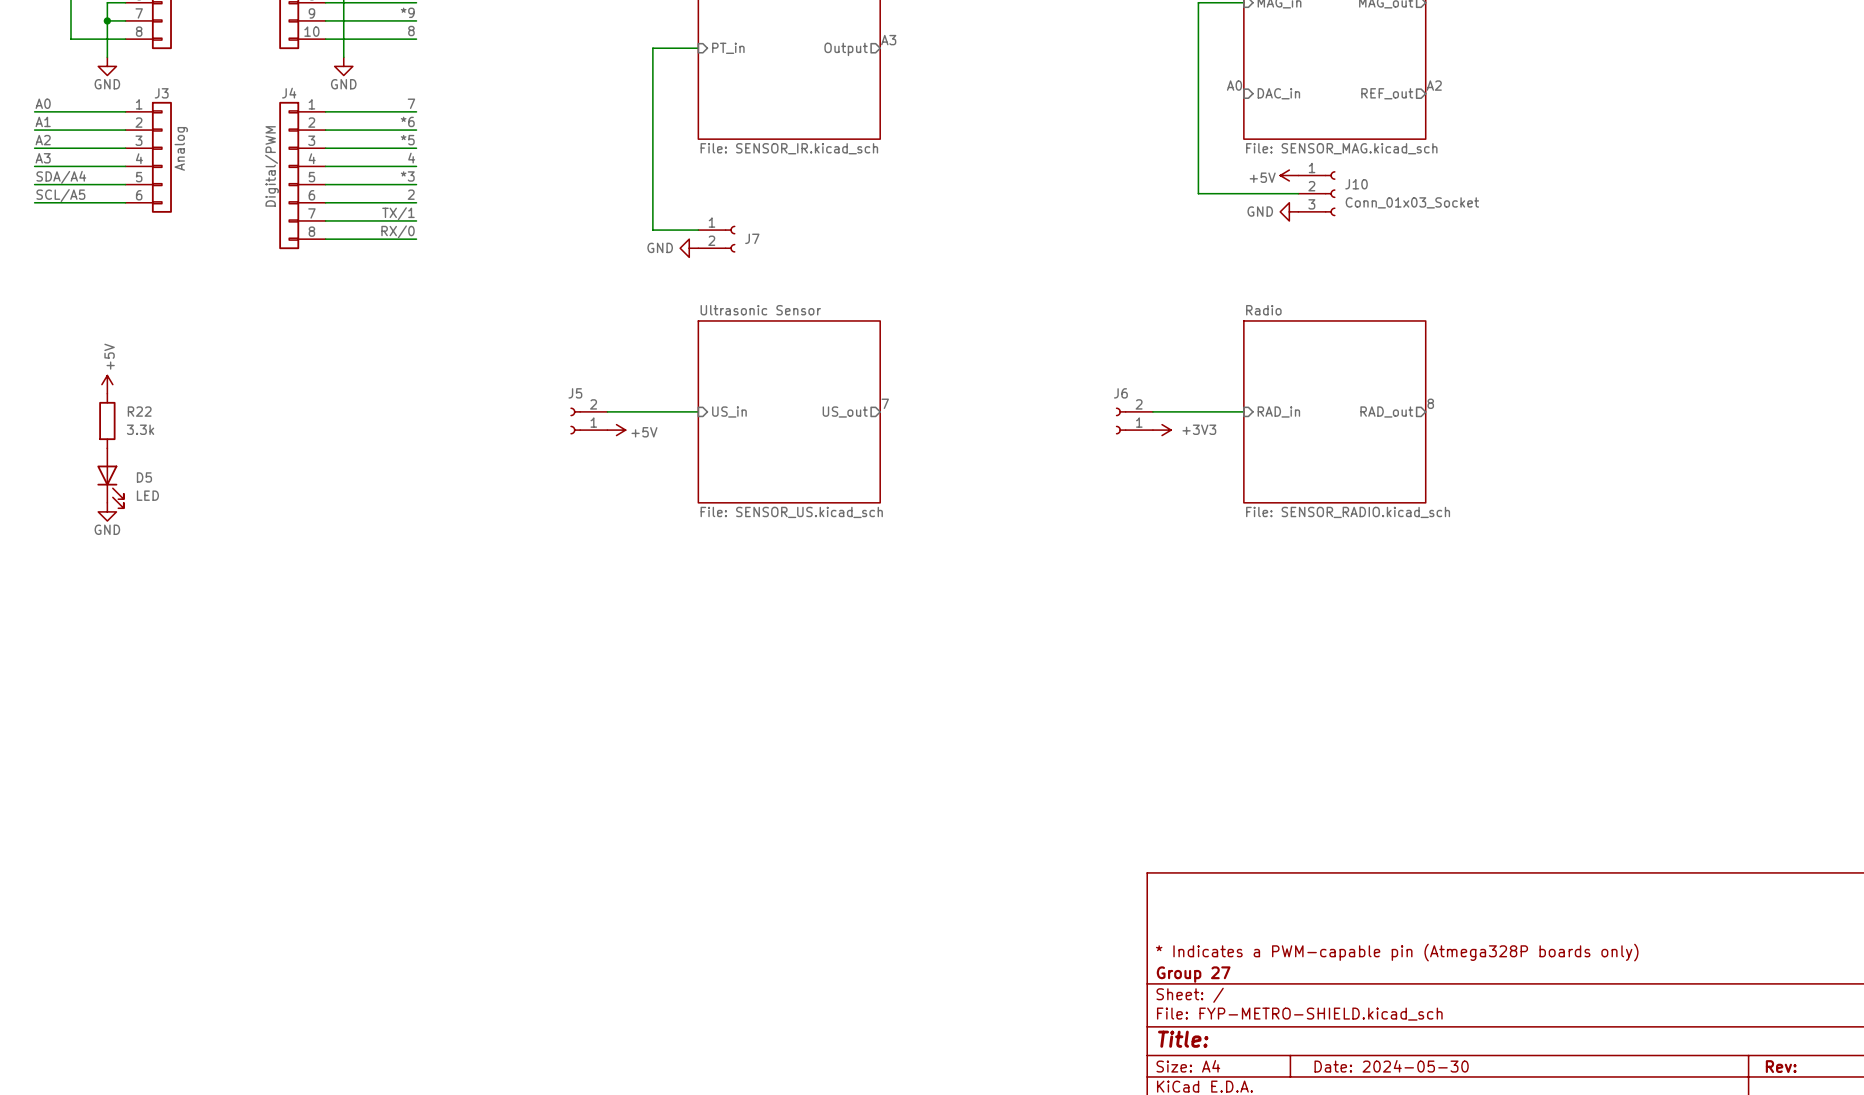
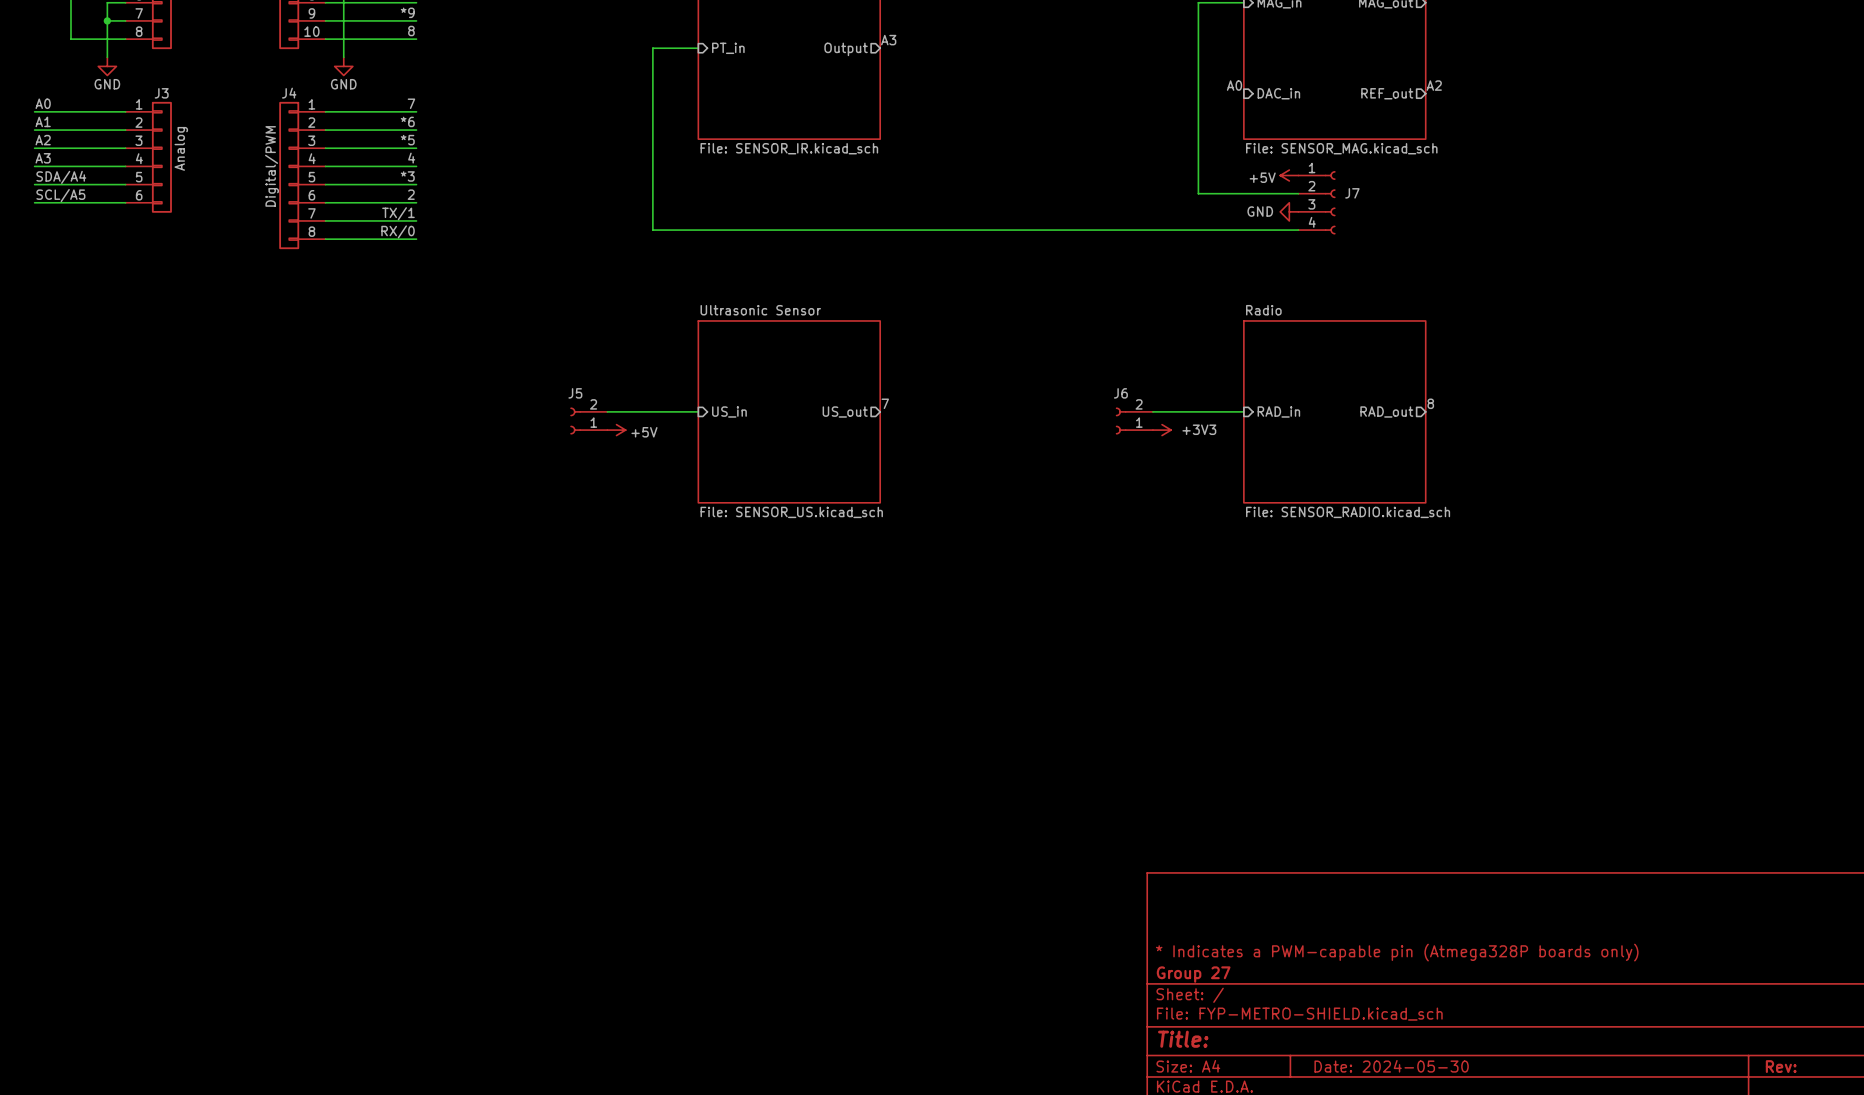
J10: Conn_01x03_Socket (1316, 193) -> none
J7 symbol: [698, 225, 736, 253] -> [1298, 171, 1336, 235]
wire: none -> (698, 230) (1298, 230)
power symbol: GND (689, 248) -> none
power symbol: +5V (107, 384) -> none
R22: 3.3k (107, 420) -> none
D5: LED (110, 478) -> none
power symbol: GND (107, 511) -> none

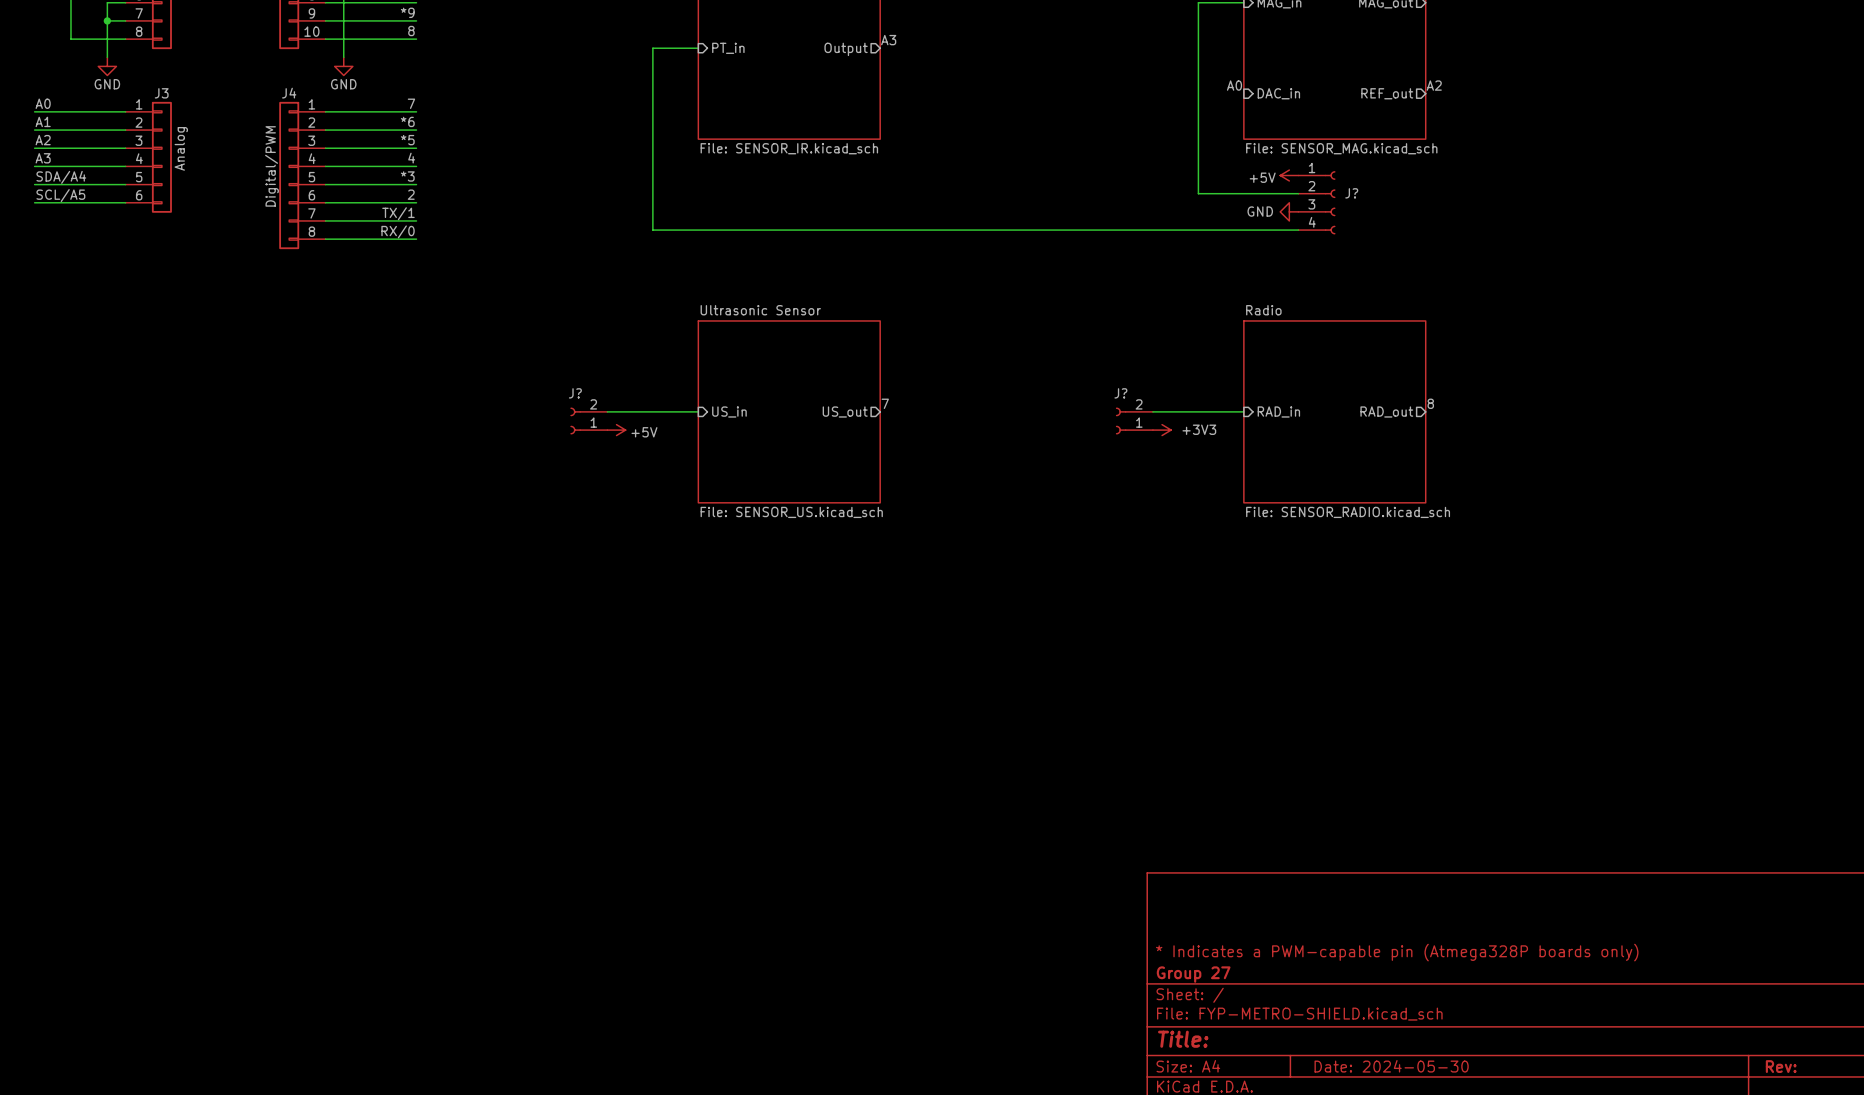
J7 name: J7 (1352, 193) -> J? (1351, 193)
J5 name: J5 (575, 393) -> J? (575, 393)
J6 name: J6 (1120, 393) -> J? (1120, 393)

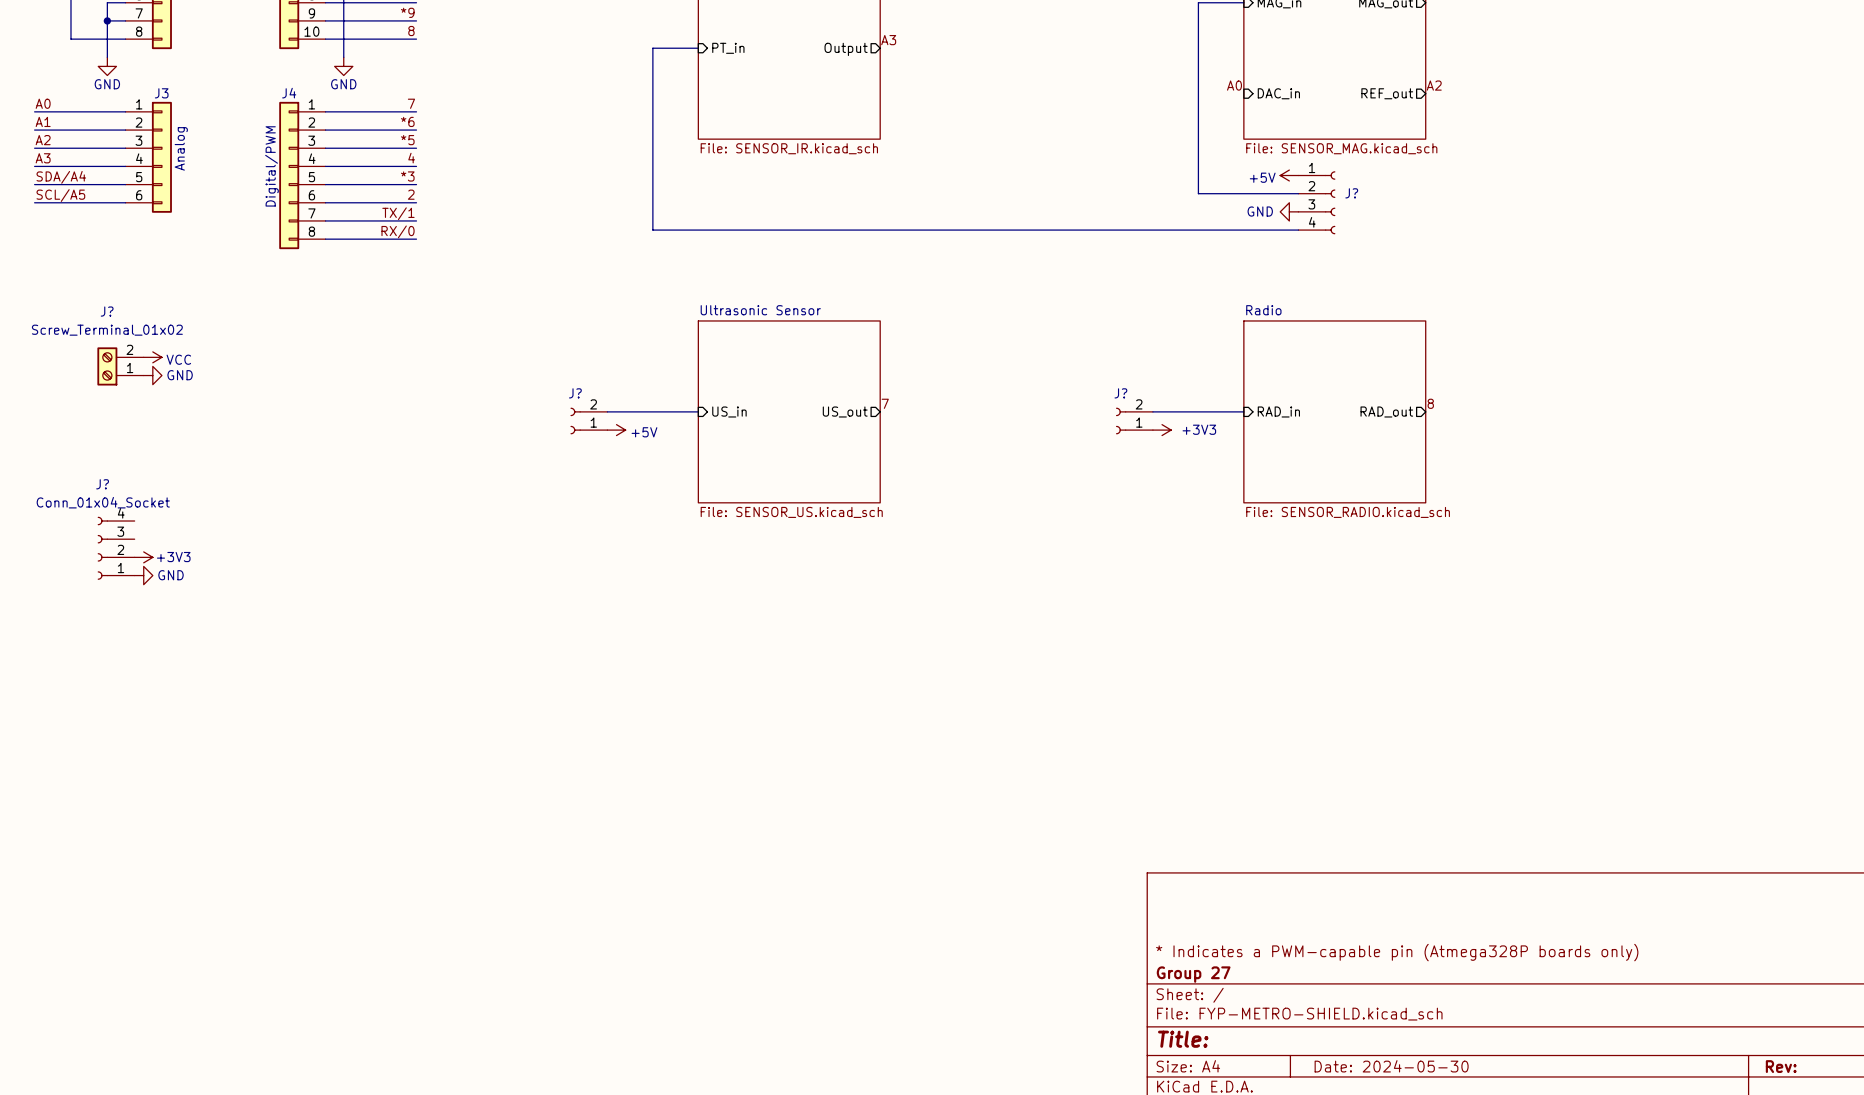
power symbol: none -> VCC (152, 357)
J?: none -> Screw_Terminal_01x02 (120, 366)
power symbol: none -> GND (152, 375)
J?: none -> Conn_01x04_Socket (116, 548)
power symbol: none -> +3V3 (143, 557)
power symbol: none -> GND (143, 575)

